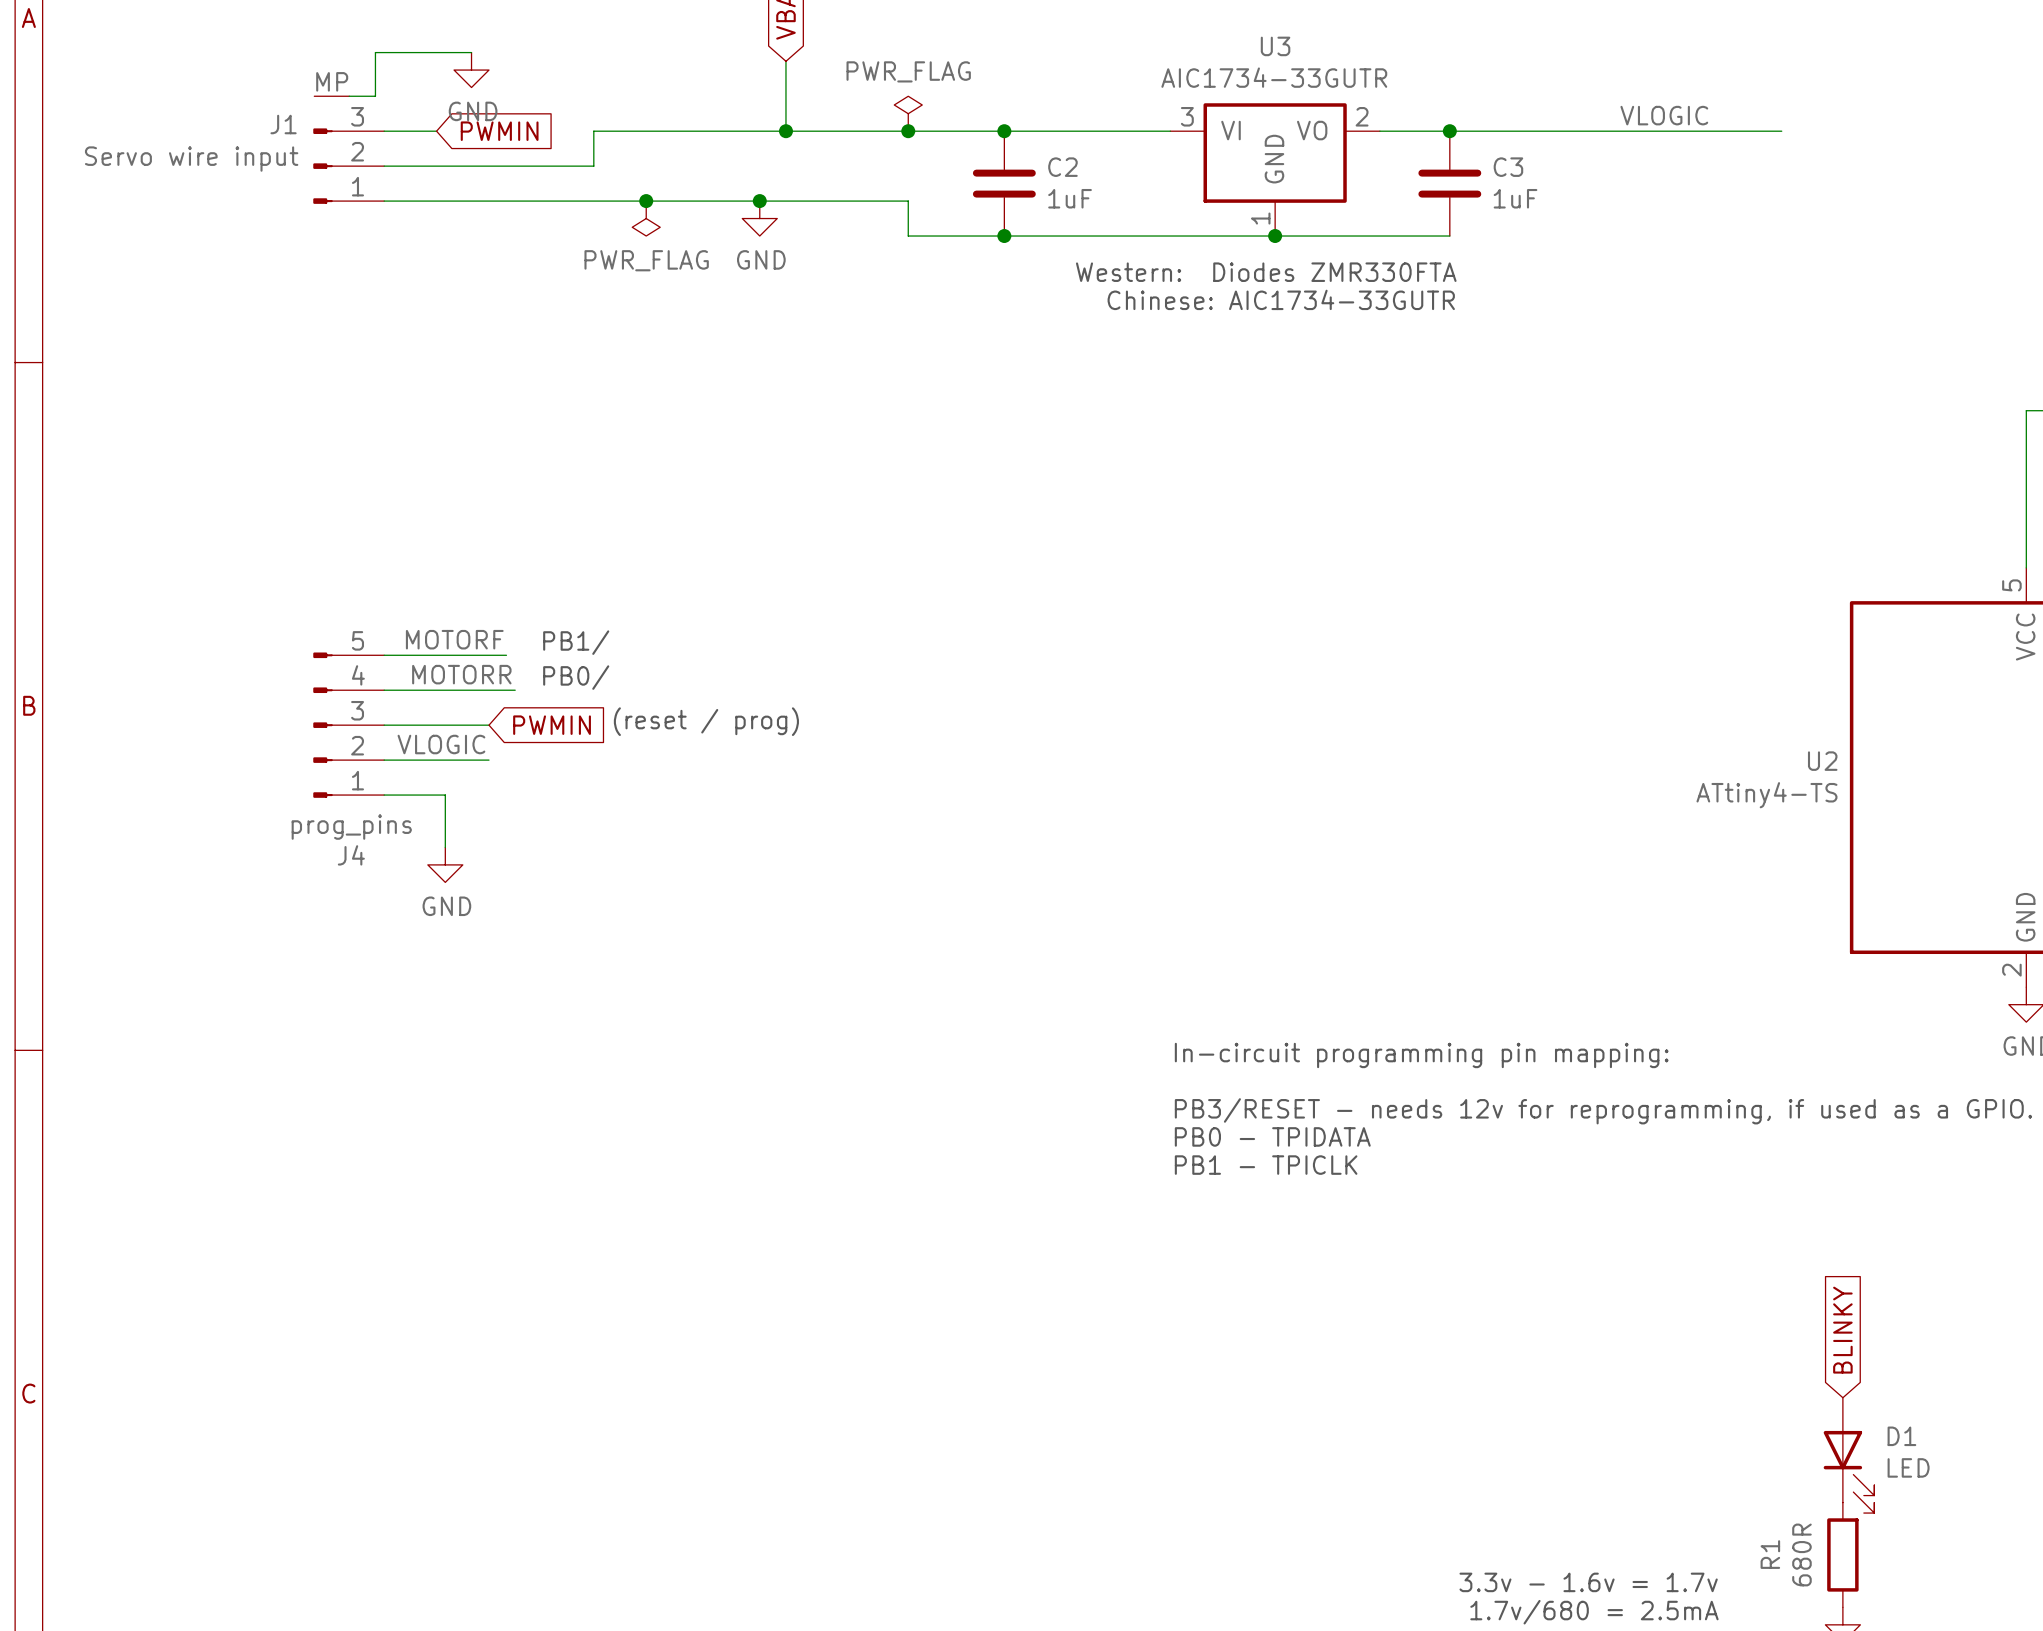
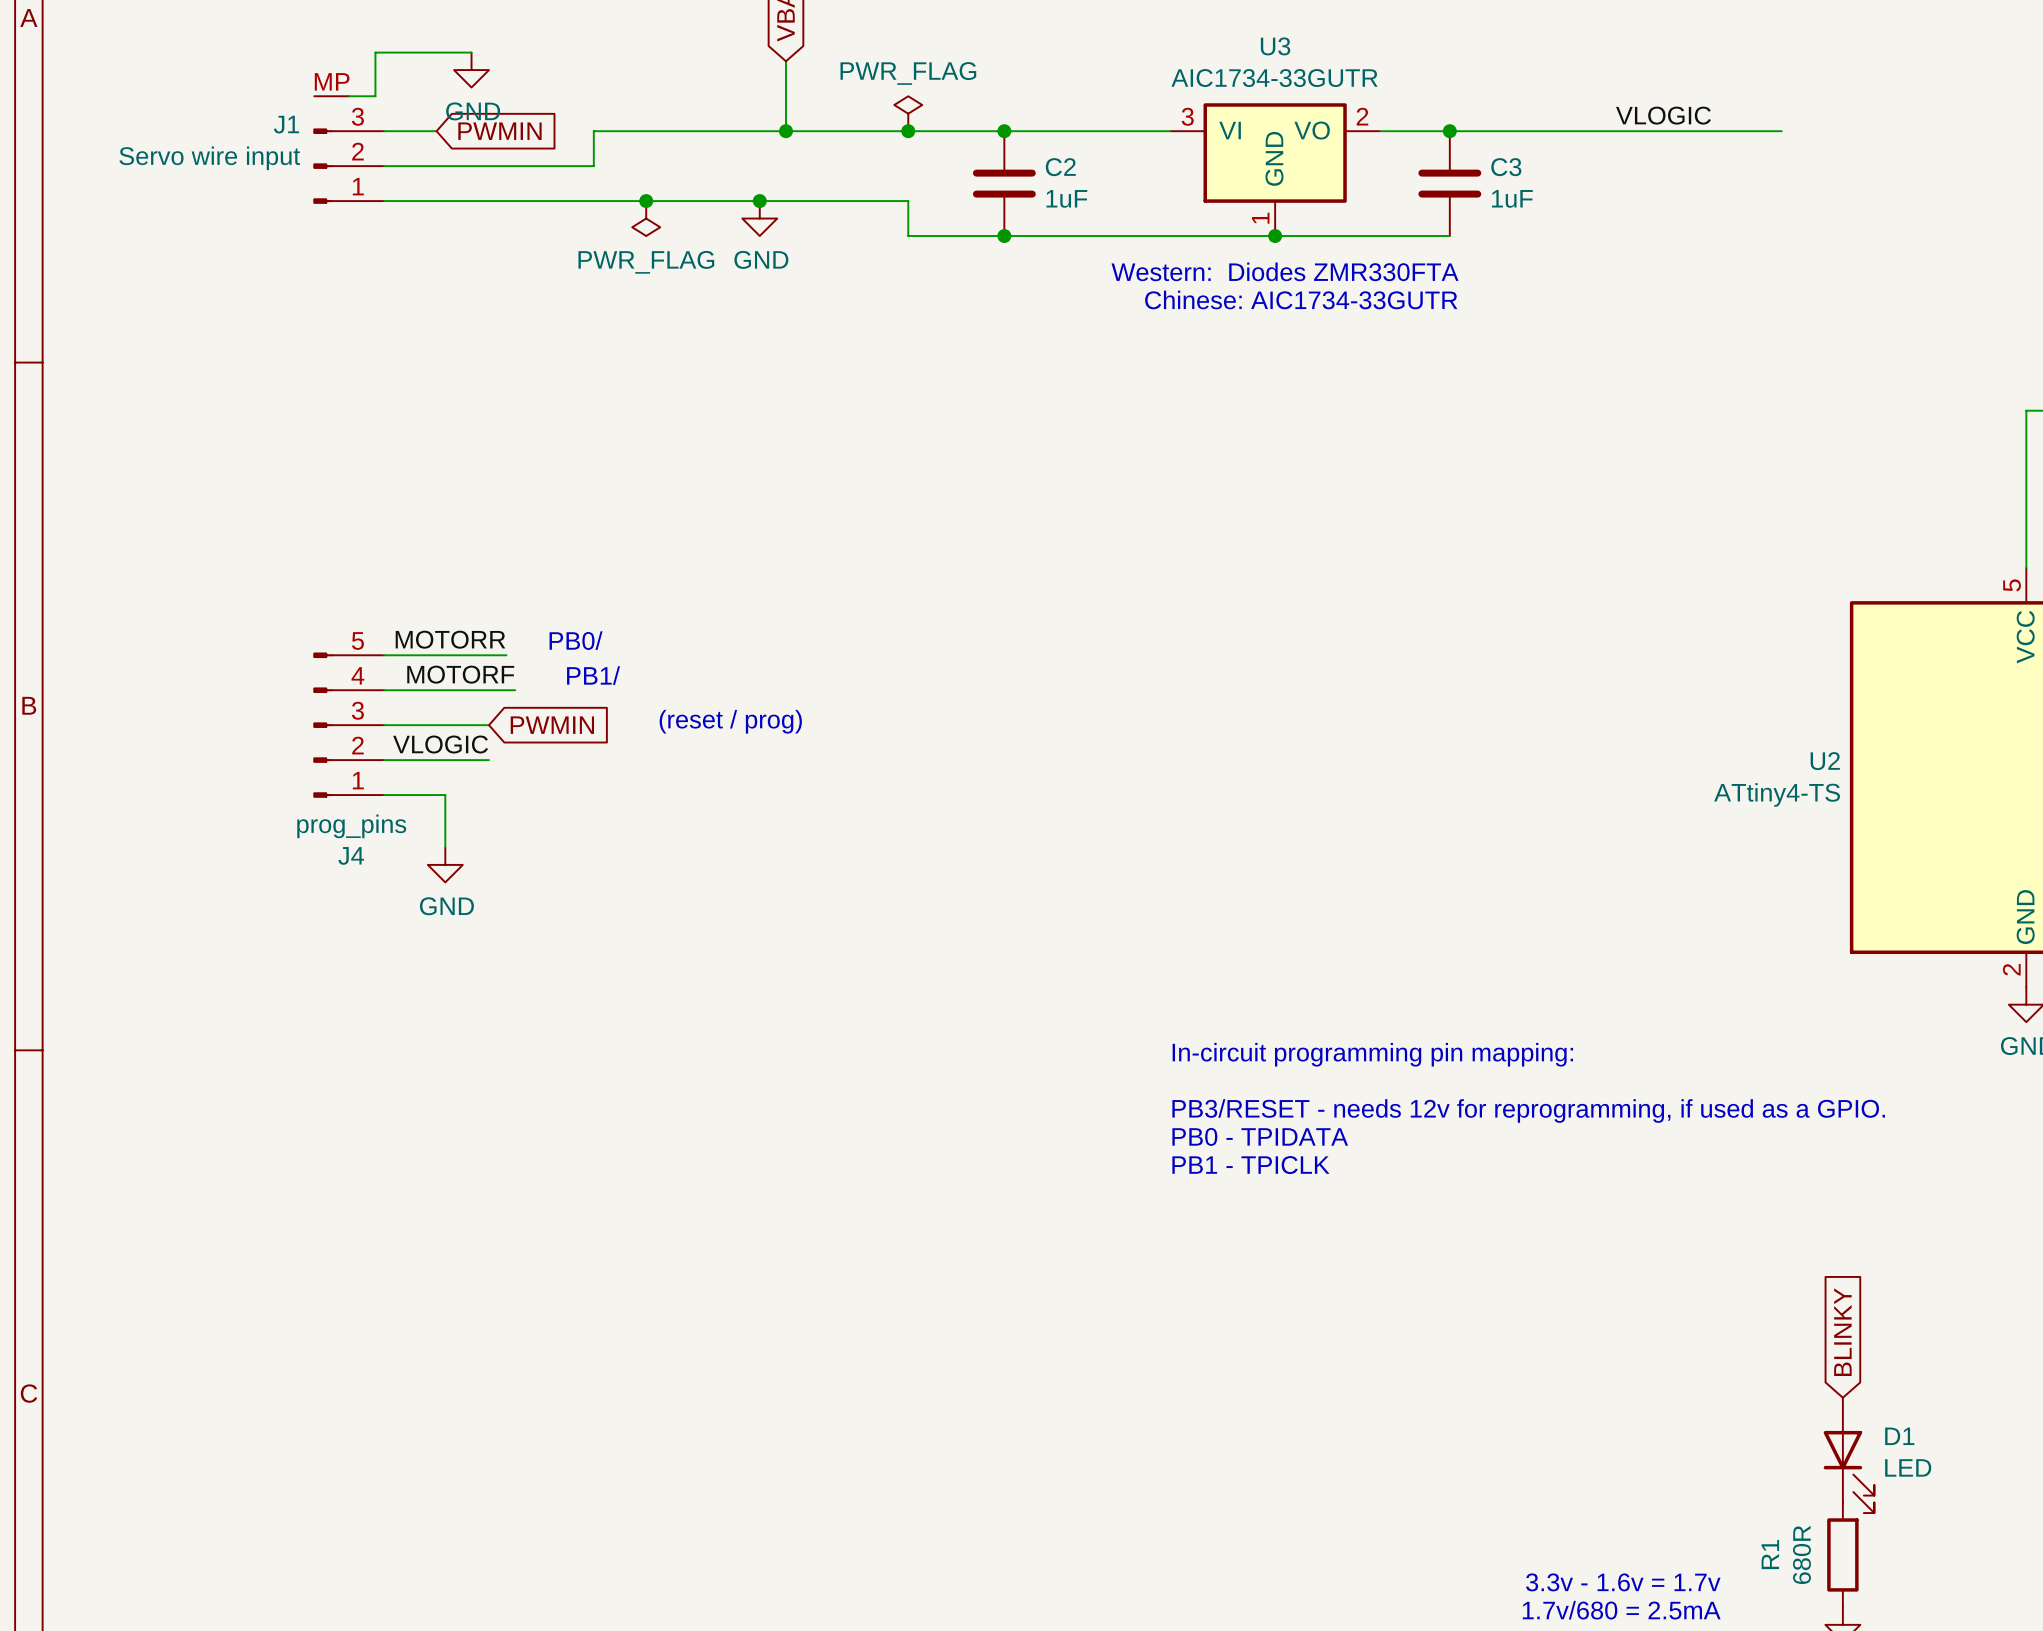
label: MOTORF (454, 639) -> MOTORR (450, 639)
text position: PB1/ (576, 642) -> PB1/ (593, 675)
label: MOTORR (461, 674) -> MOTORF (460, 674)
text position: PB0/ (576, 677) -> PB0/ (576, 640)

